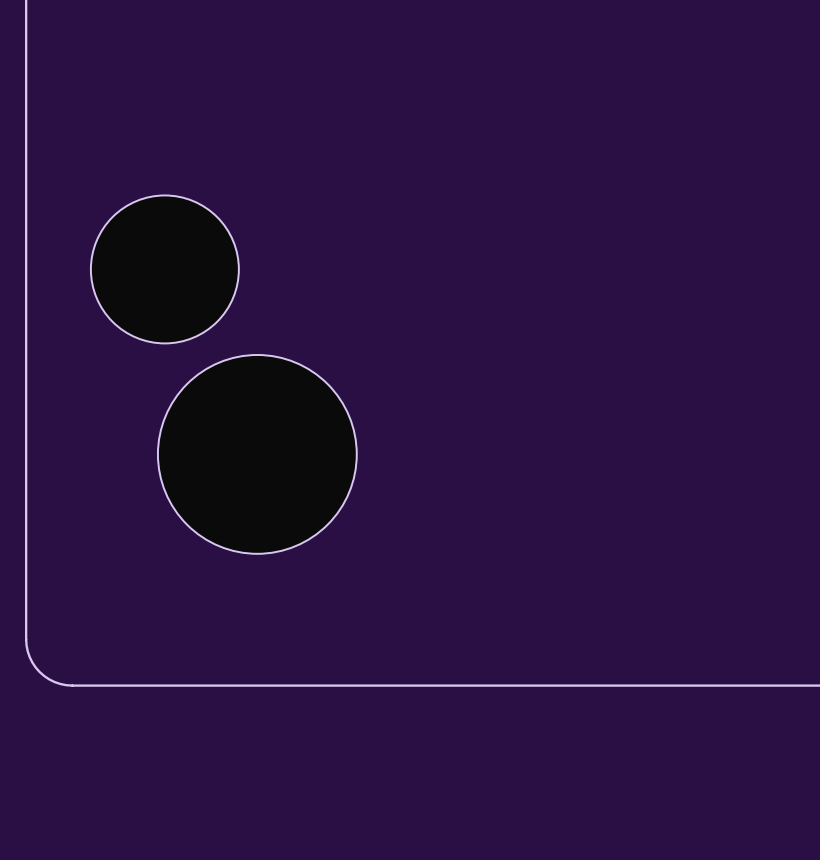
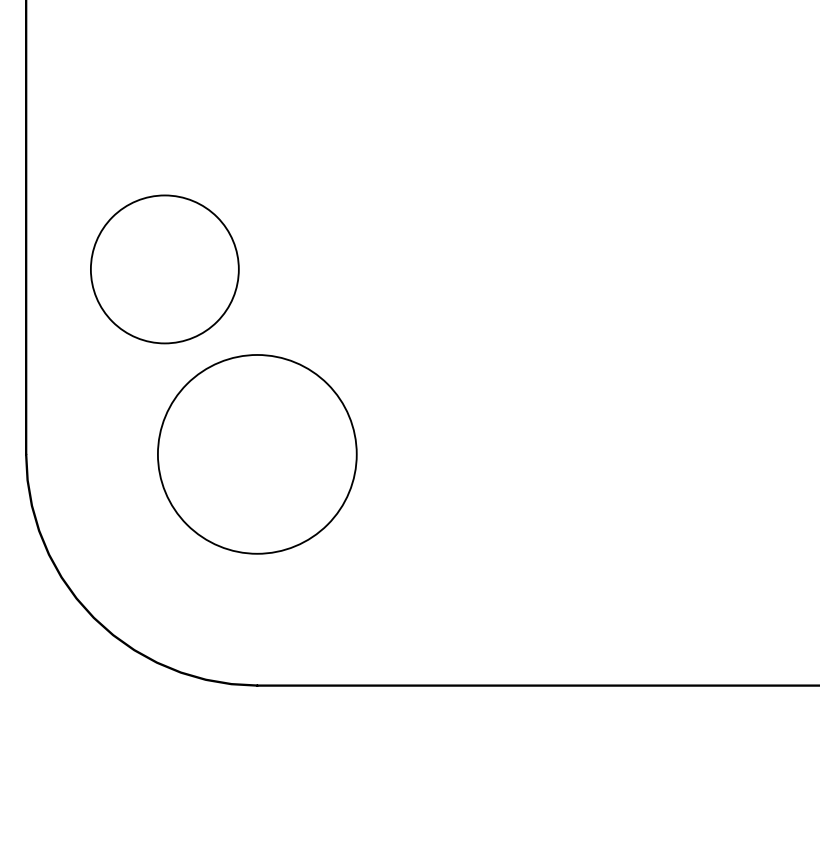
board edge: (26, 454) (26, 639) (29, 657) (39, 672) (54, 682) (72, 685) (257, 685) -> (26, 454) (27, 480) (39, 530) (61, 577) (93, 617) (134, 650) (181, 672) (231, 684) (257, 685)

